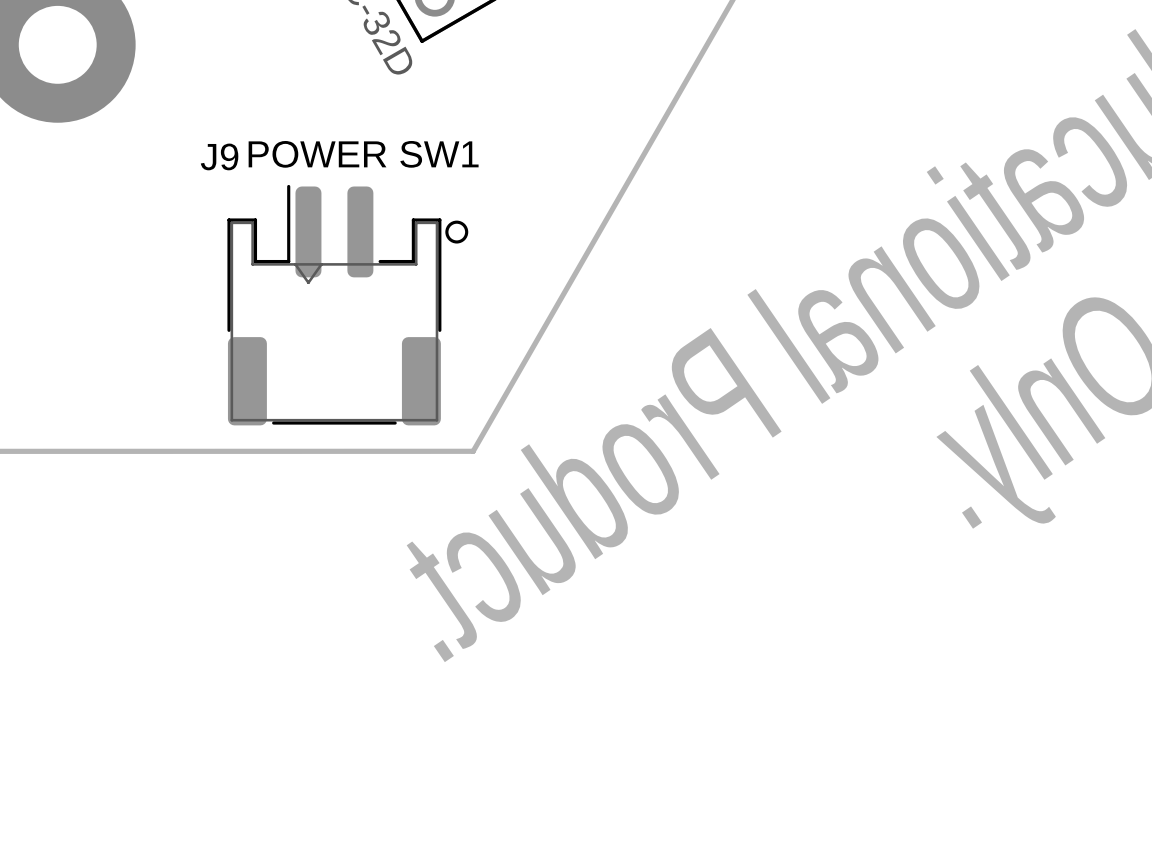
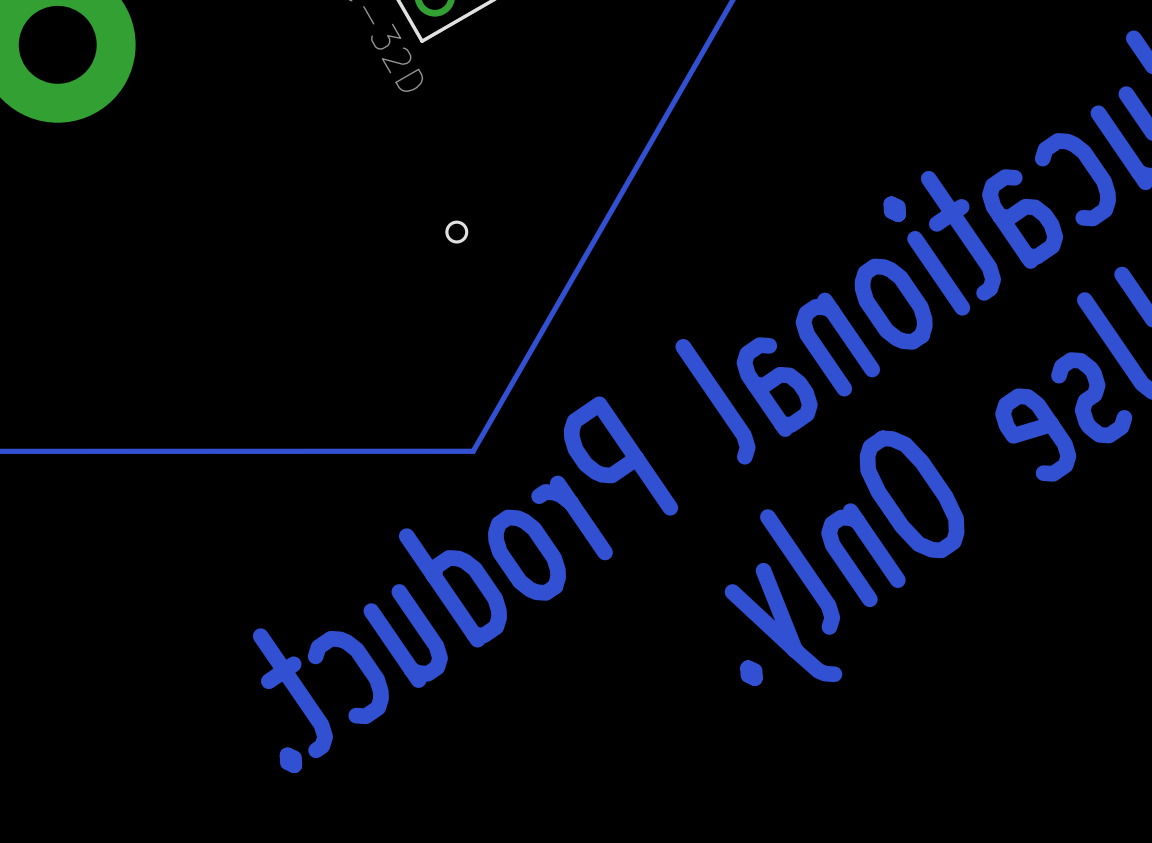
J9: POWER SW1 (334, 305) -> none

